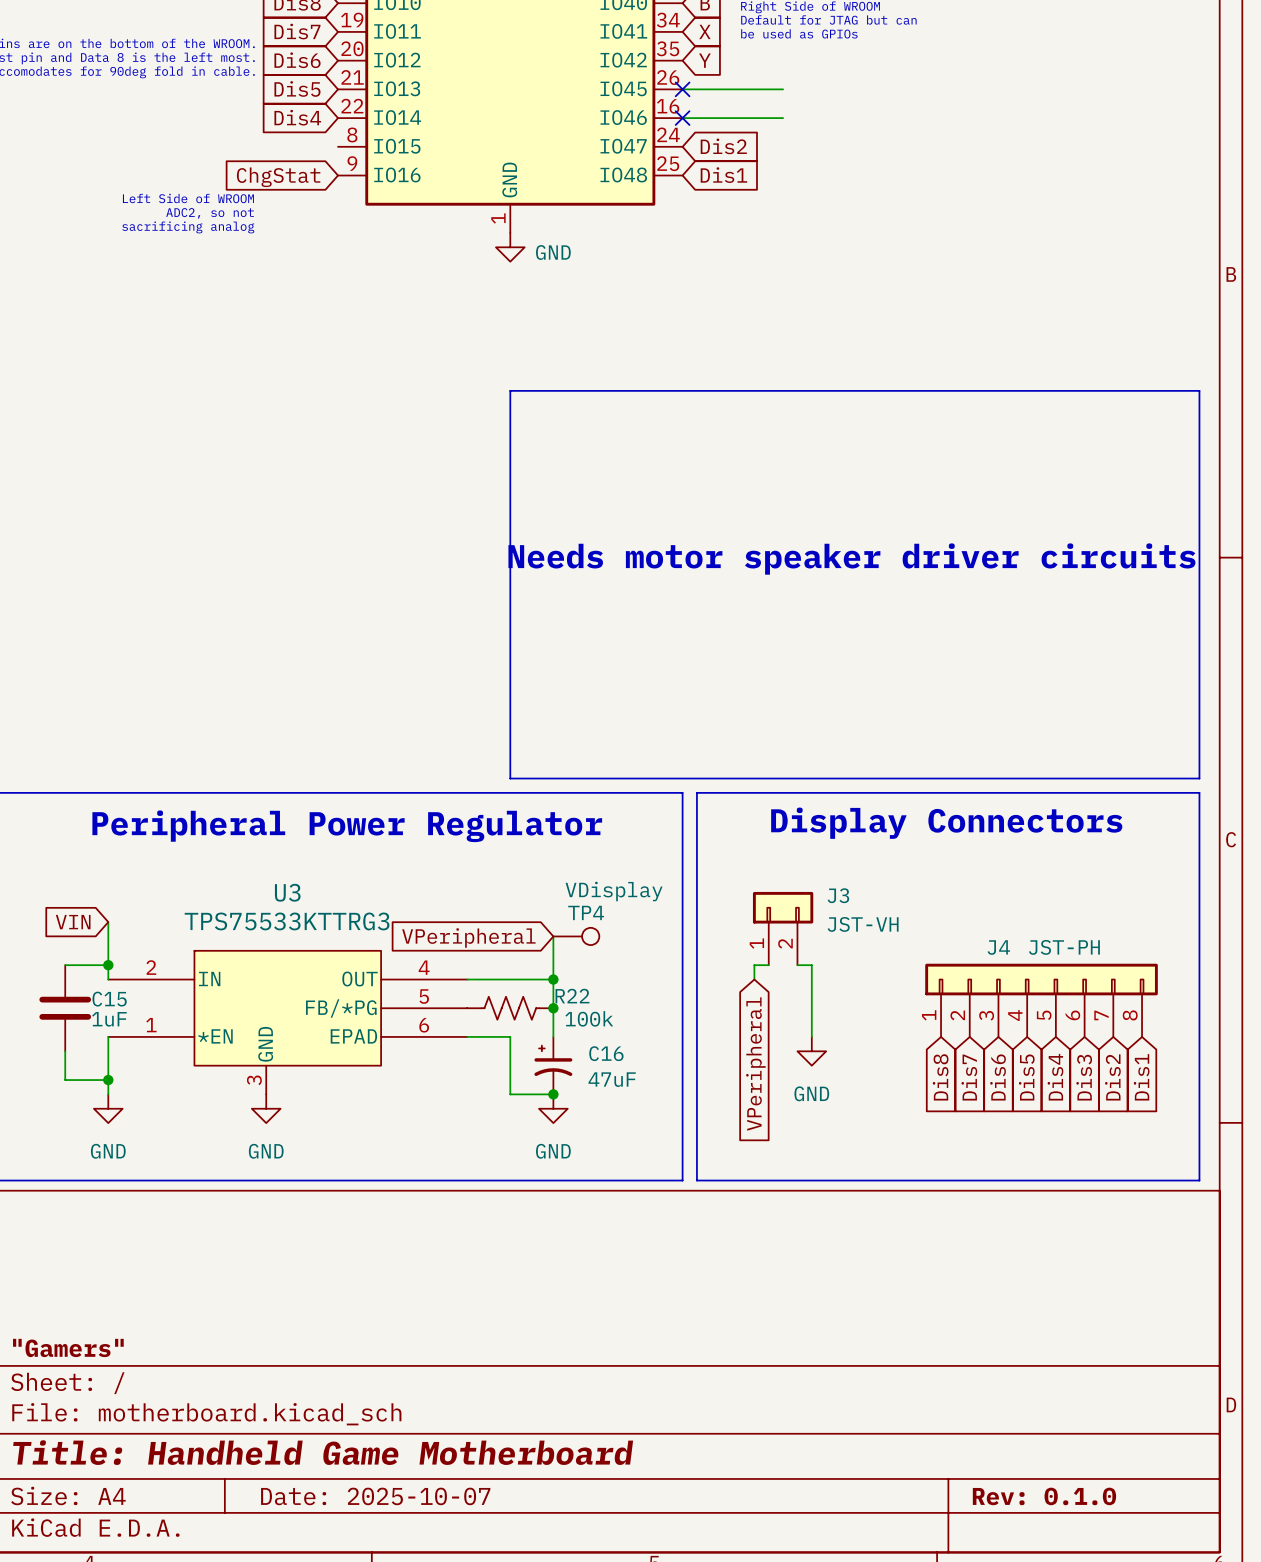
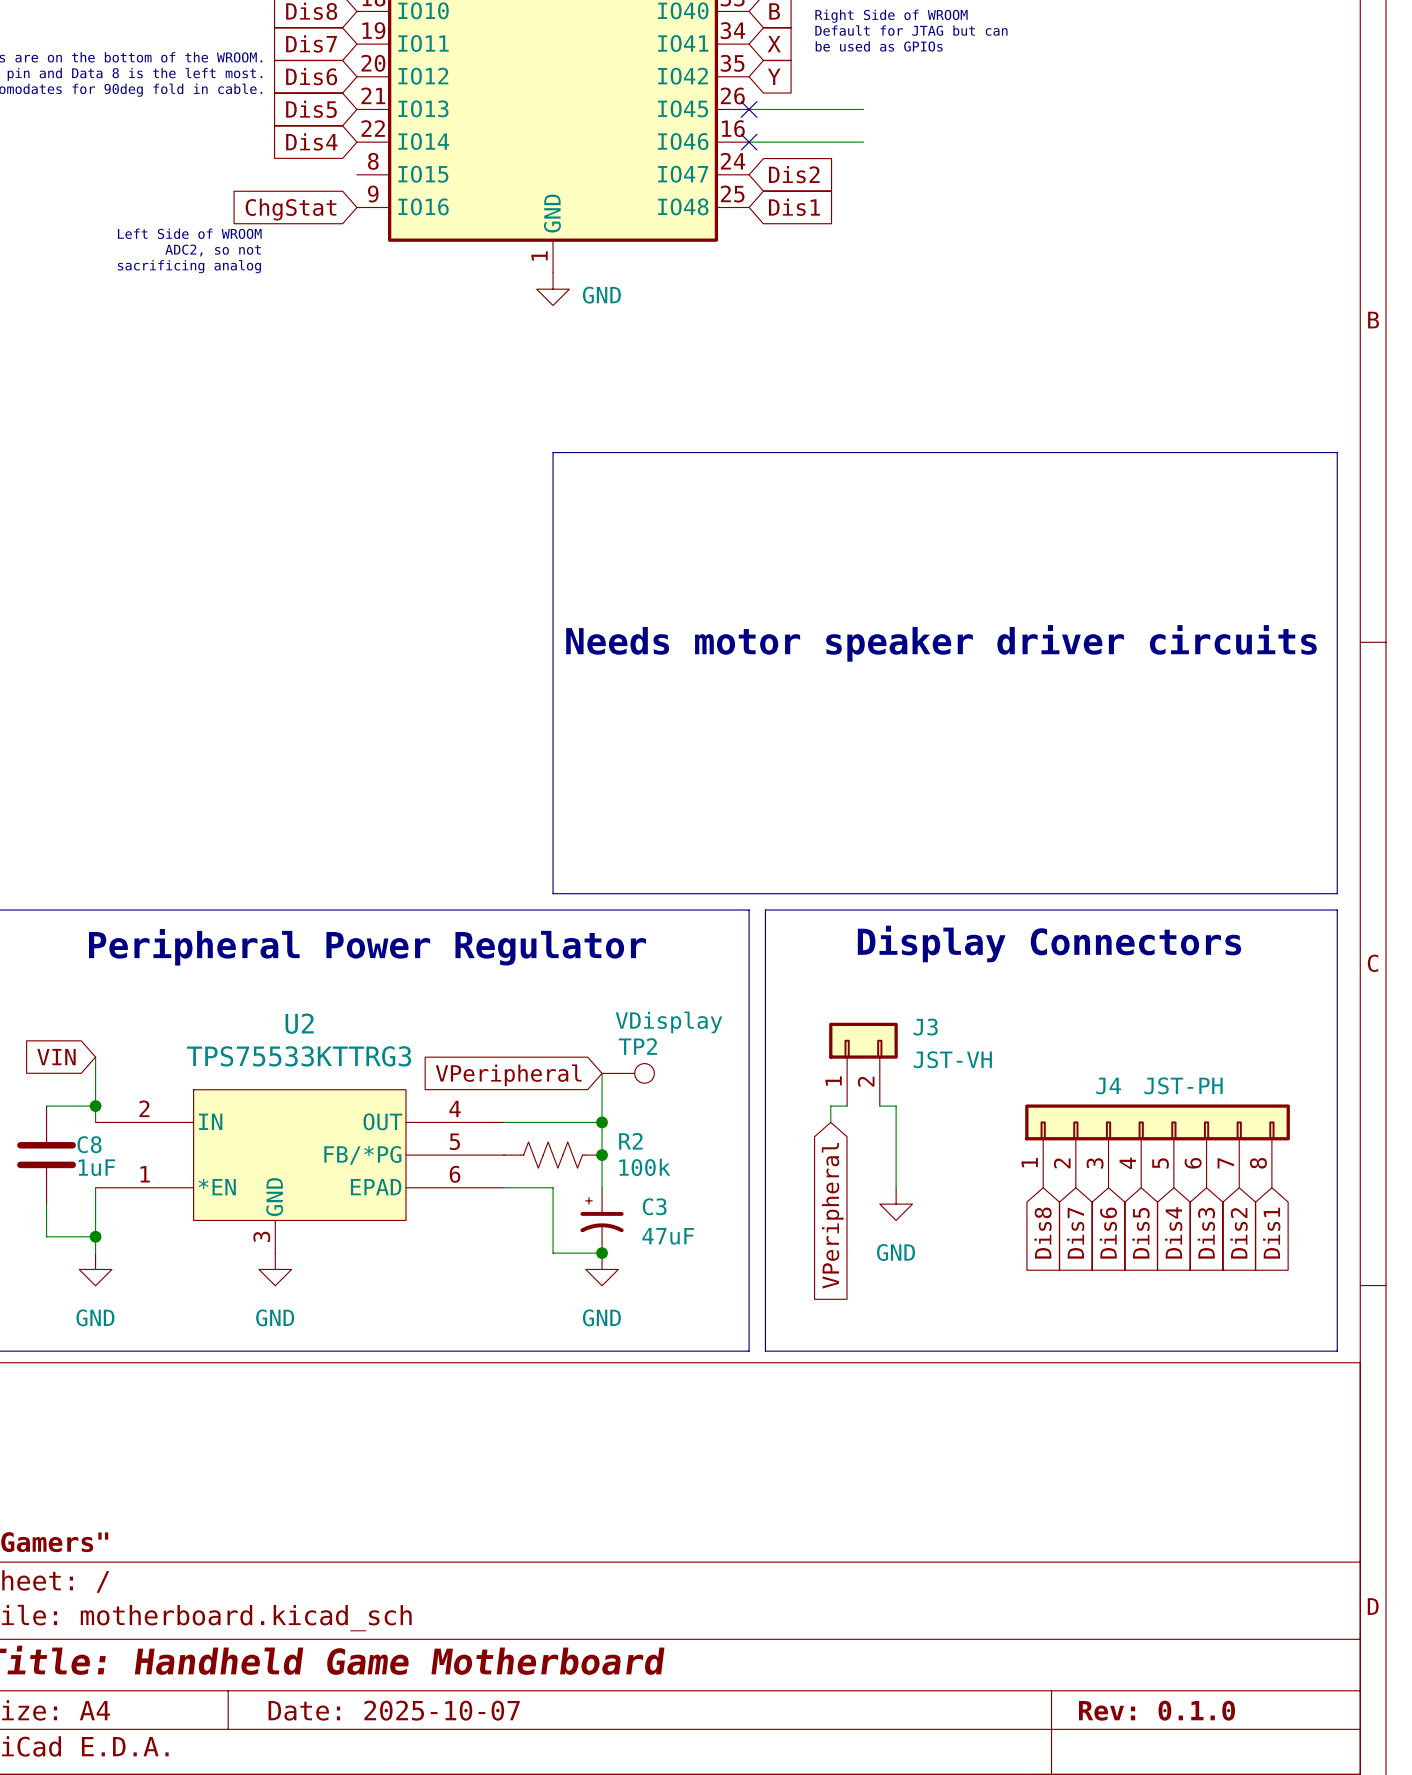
U3 name: U3 (287, 892) -> U2 (299, 1023)
TP4 name: TP4 (586, 912) -> TP2 (637, 1046)
R22 name: R22 (572, 996) -> R2 (630, 1141)
C15 name: C15 (109, 999) -> C8 (89, 1144)
C16 name: C16 (606, 1053) -> C3 (654, 1206)

